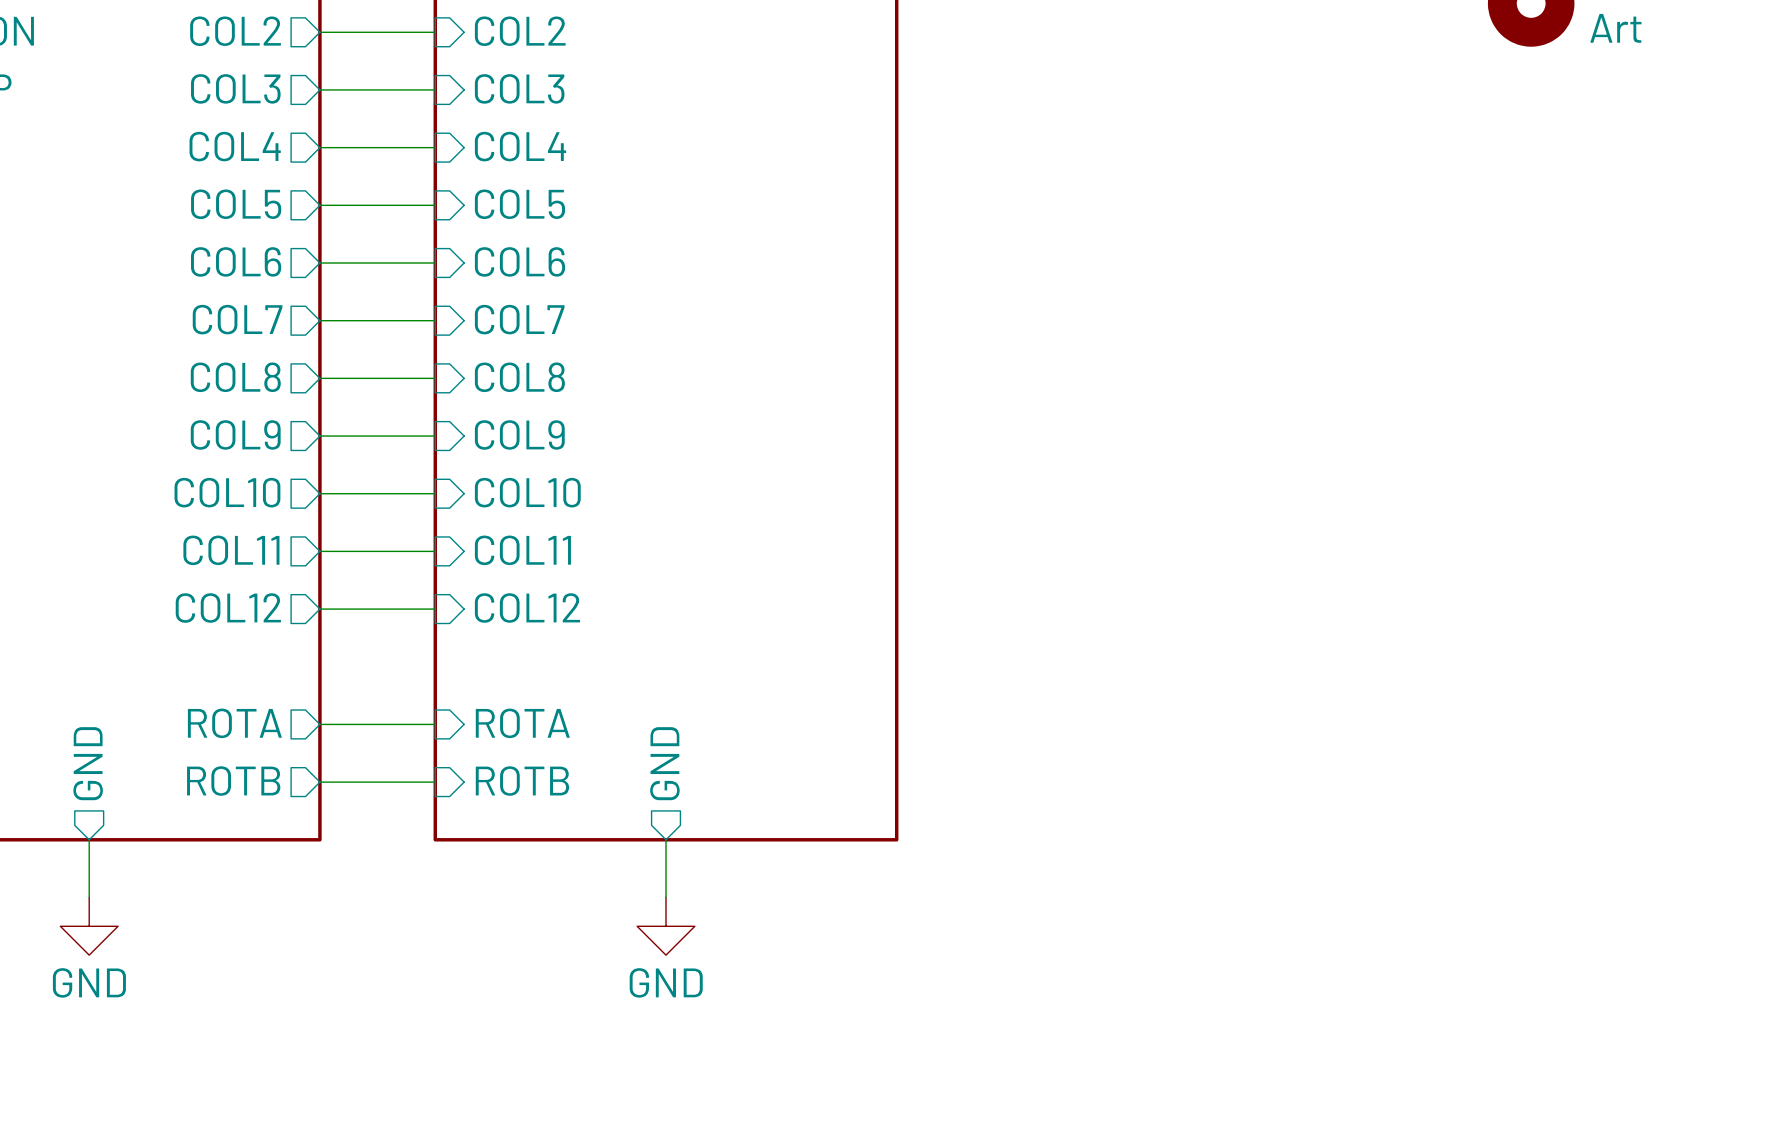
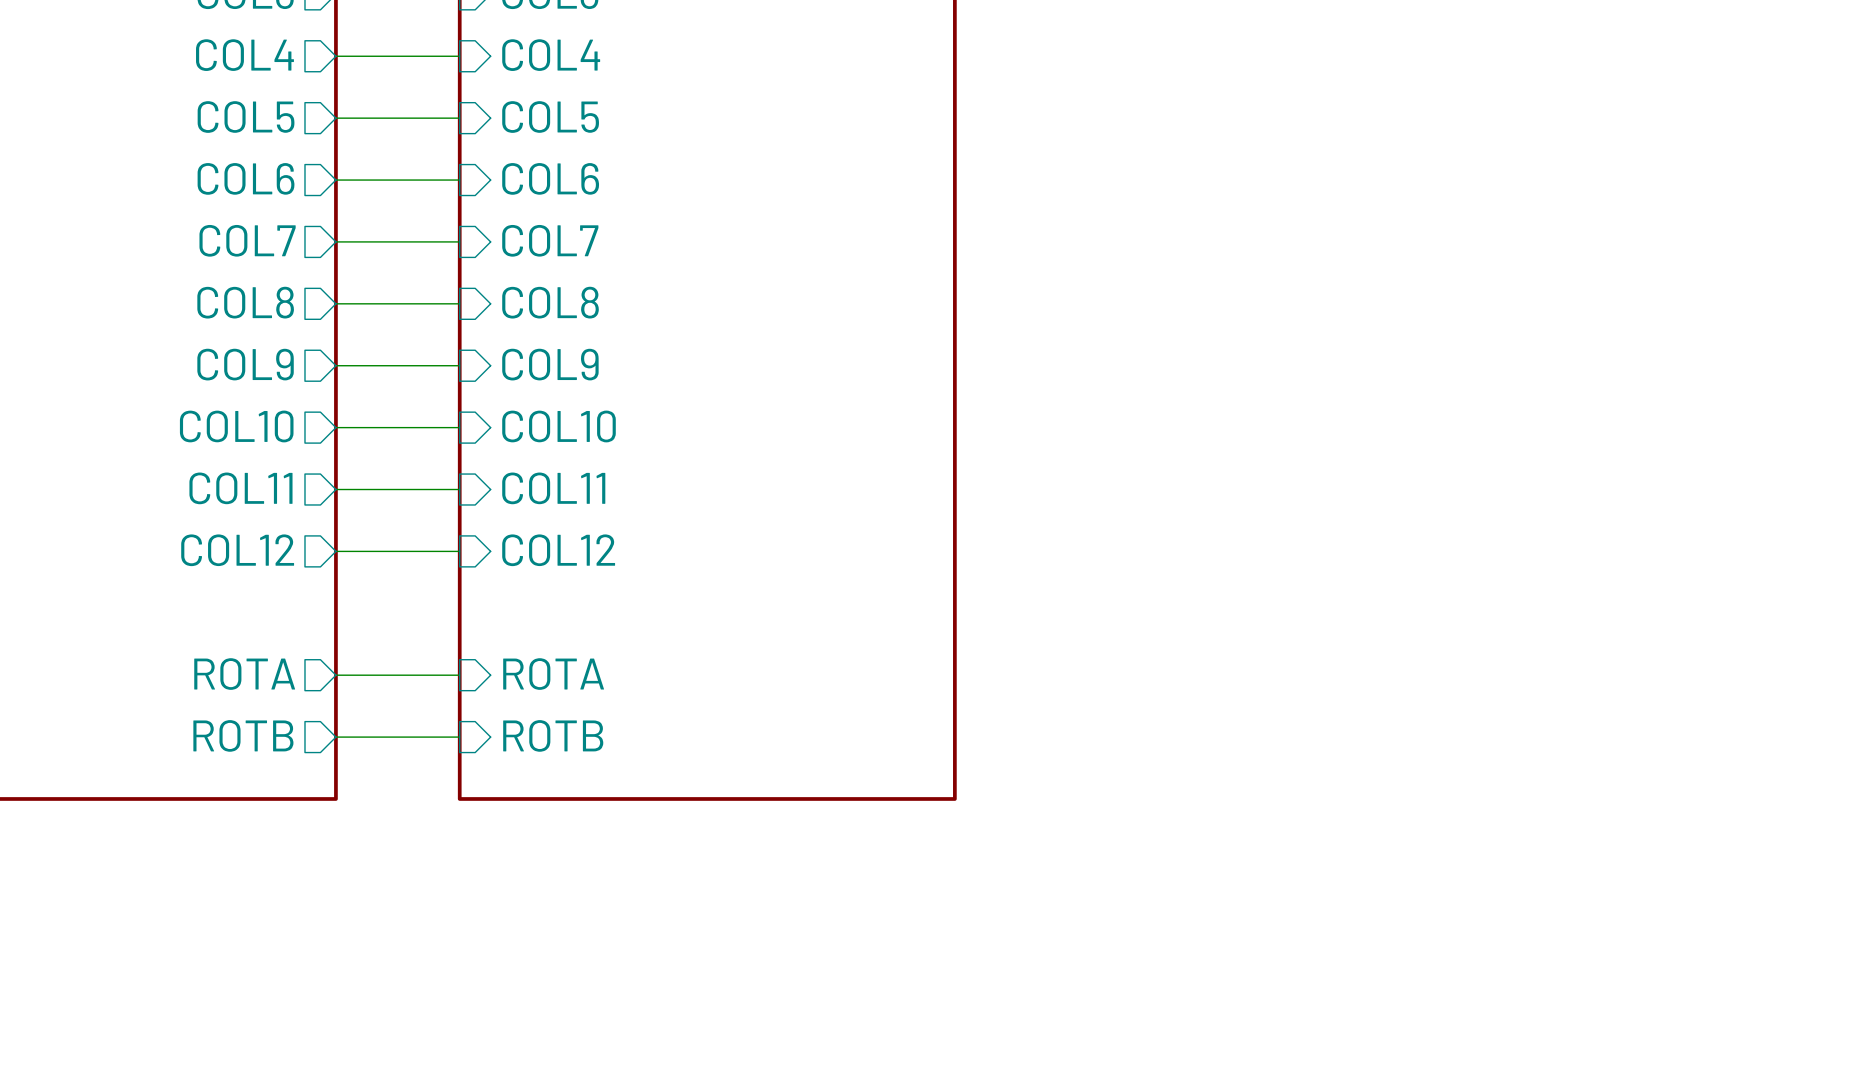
sheet pin: GND (88, 763) -> none
sheet pin: GND (664, 763) -> none
wire: (89, 839) (89, 897) -> none
wire: (666, 839) (666, 897) -> none
power symbol: GND (89, 926) -> none
power symbol: GND (666, 926) -> none

